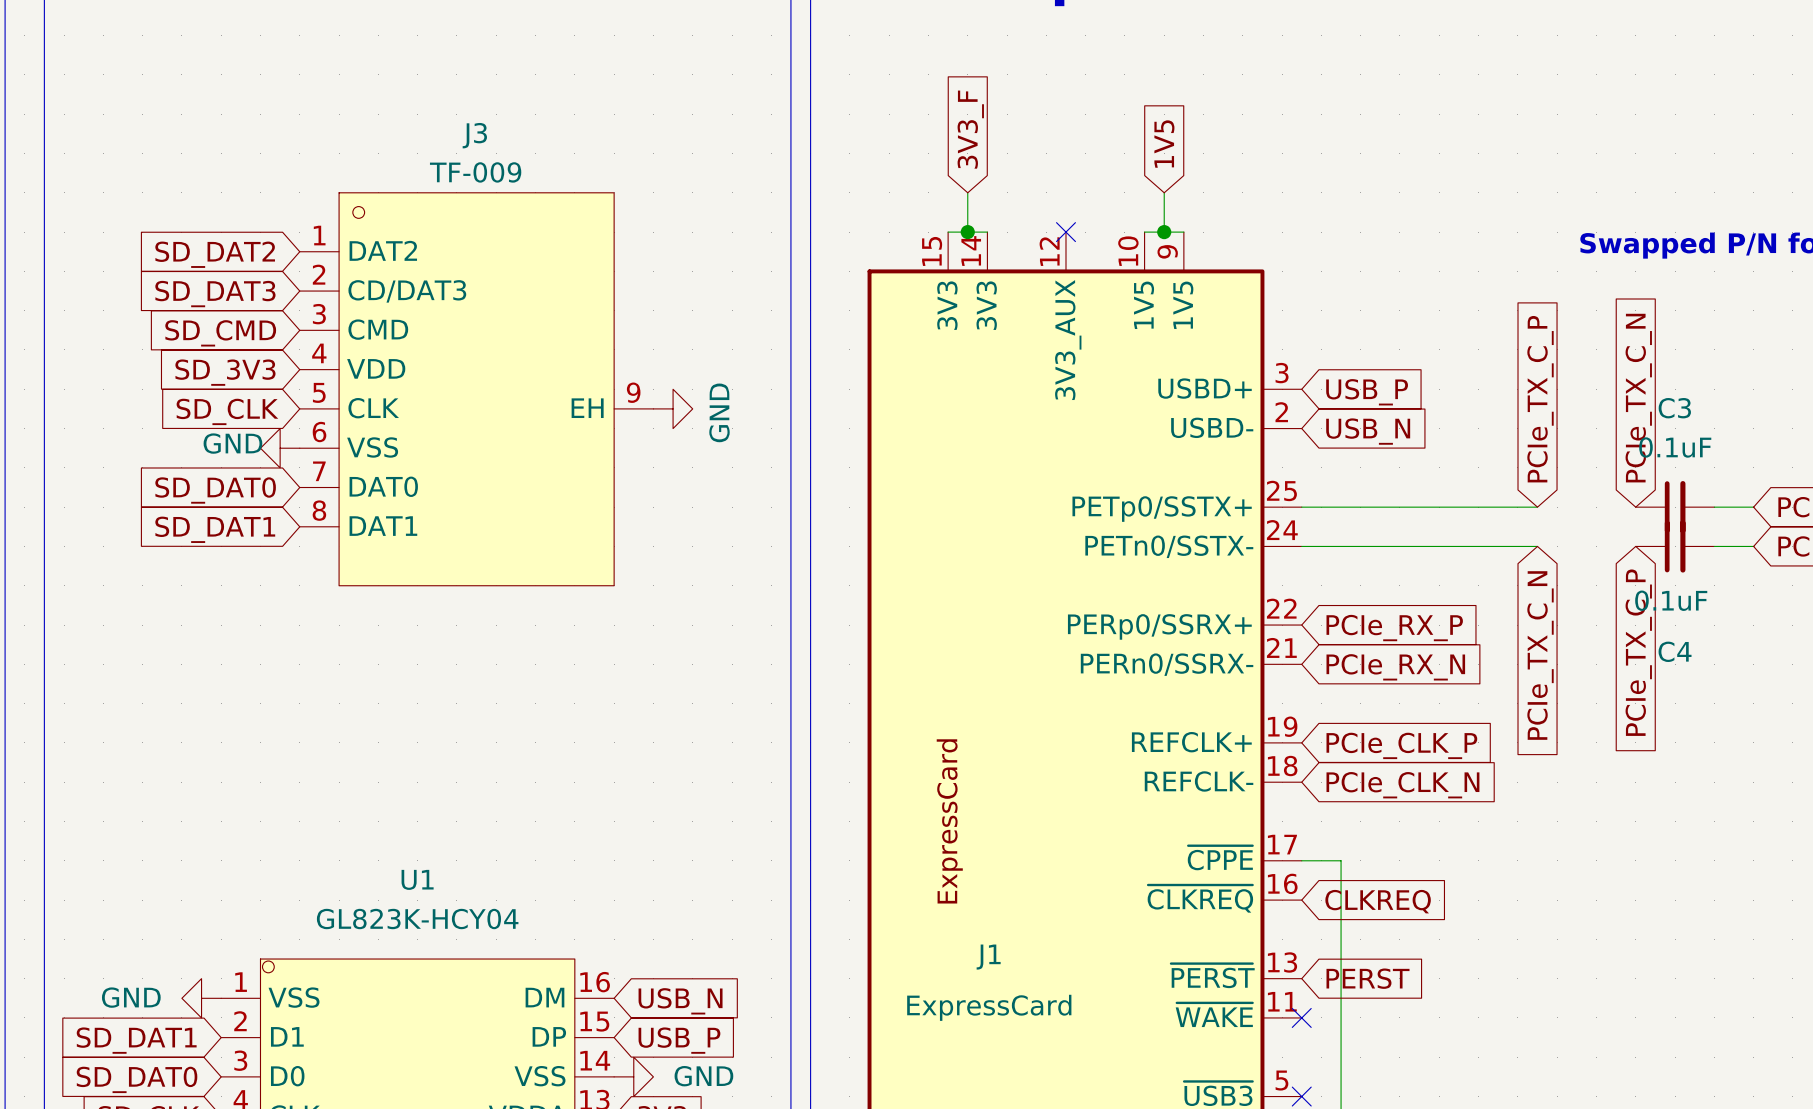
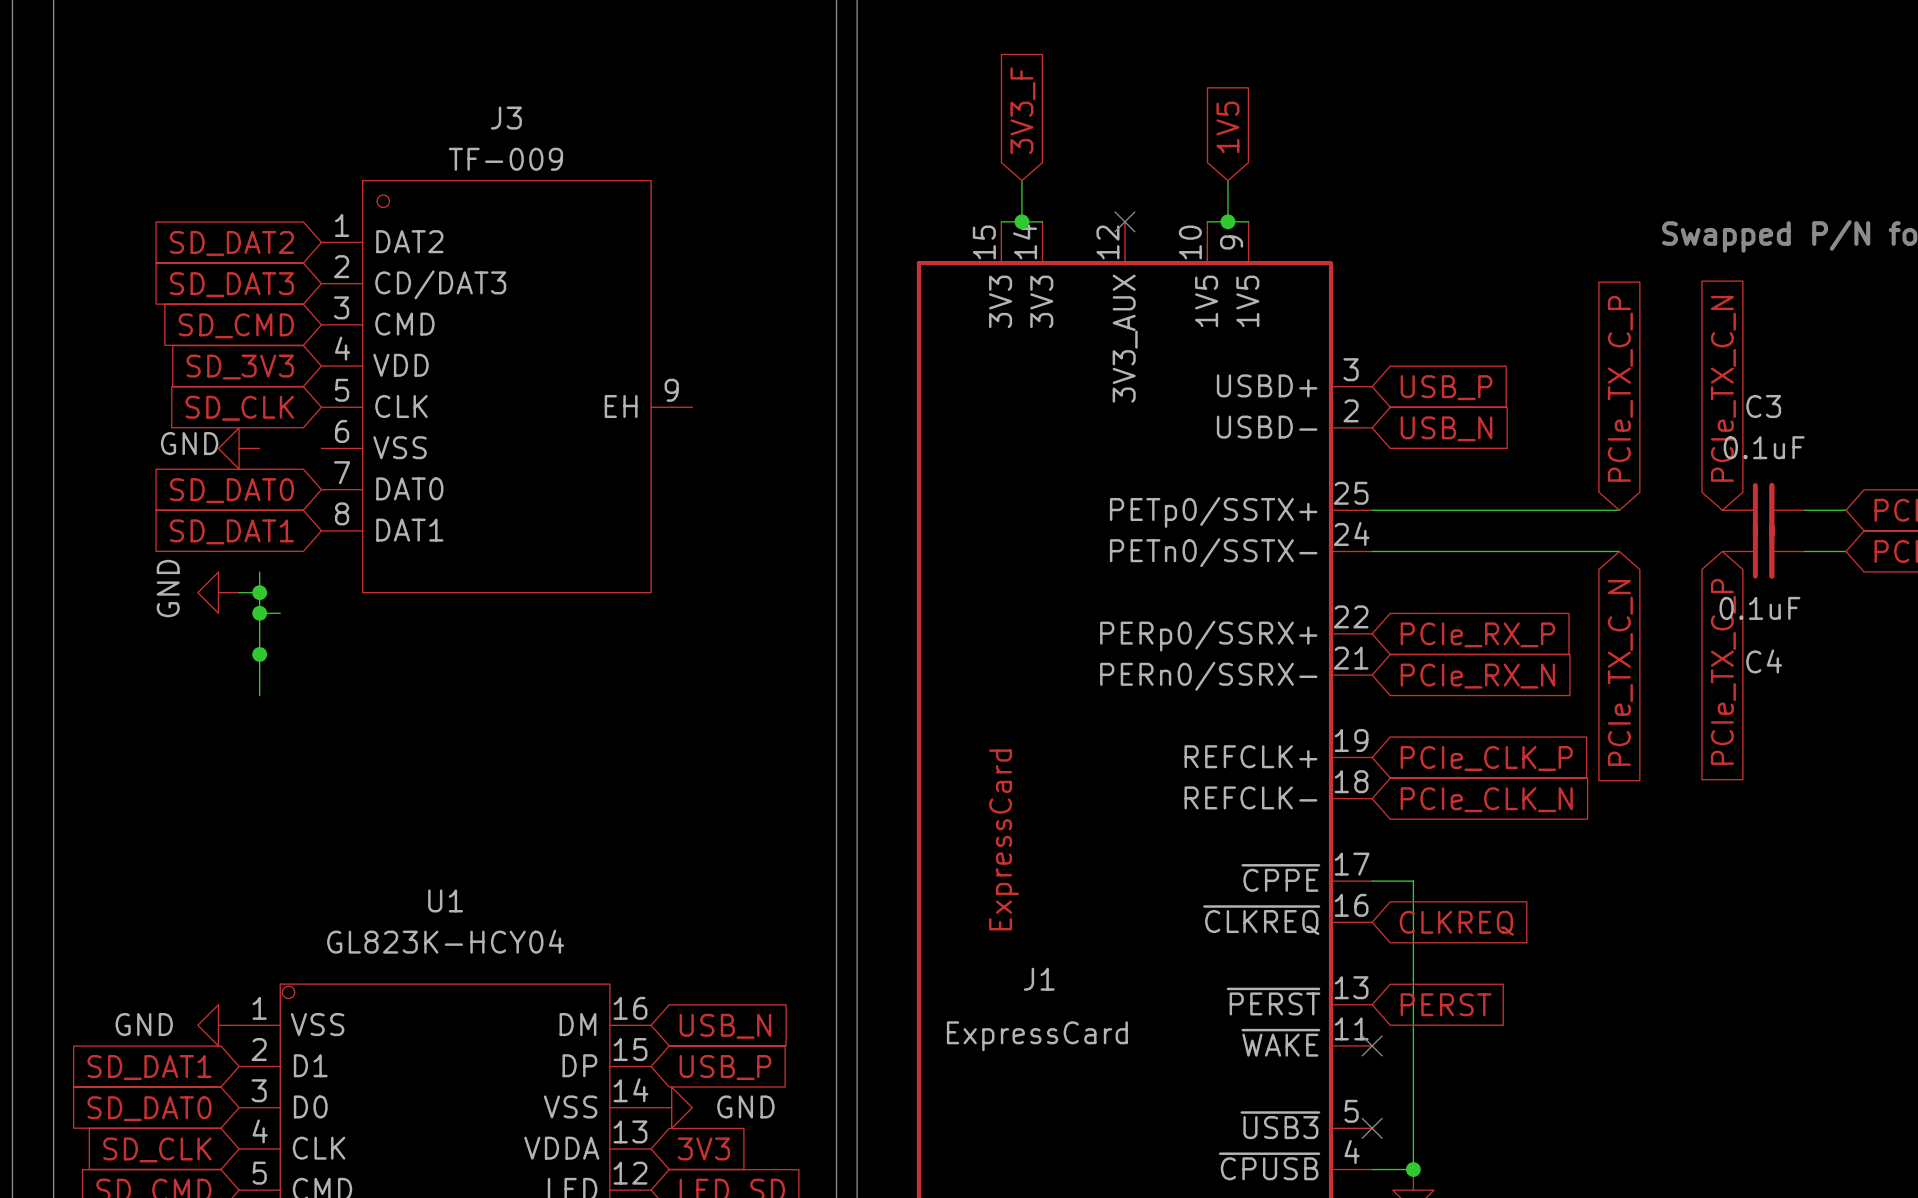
power symbol: GND (673, 408) -> none
power symbol position: GND (280, 448) -> GND (239, 448)
wire: none -> (259, 572) (259, 695)
power symbol: none -> GND (218, 592)
wire: none -> (239, 592) (259, 592)
junction: none -> (259, 592)
wire: none -> (259, 613) (280, 613)
junction: none -> (259, 613)
junction: none -> (259, 654)

